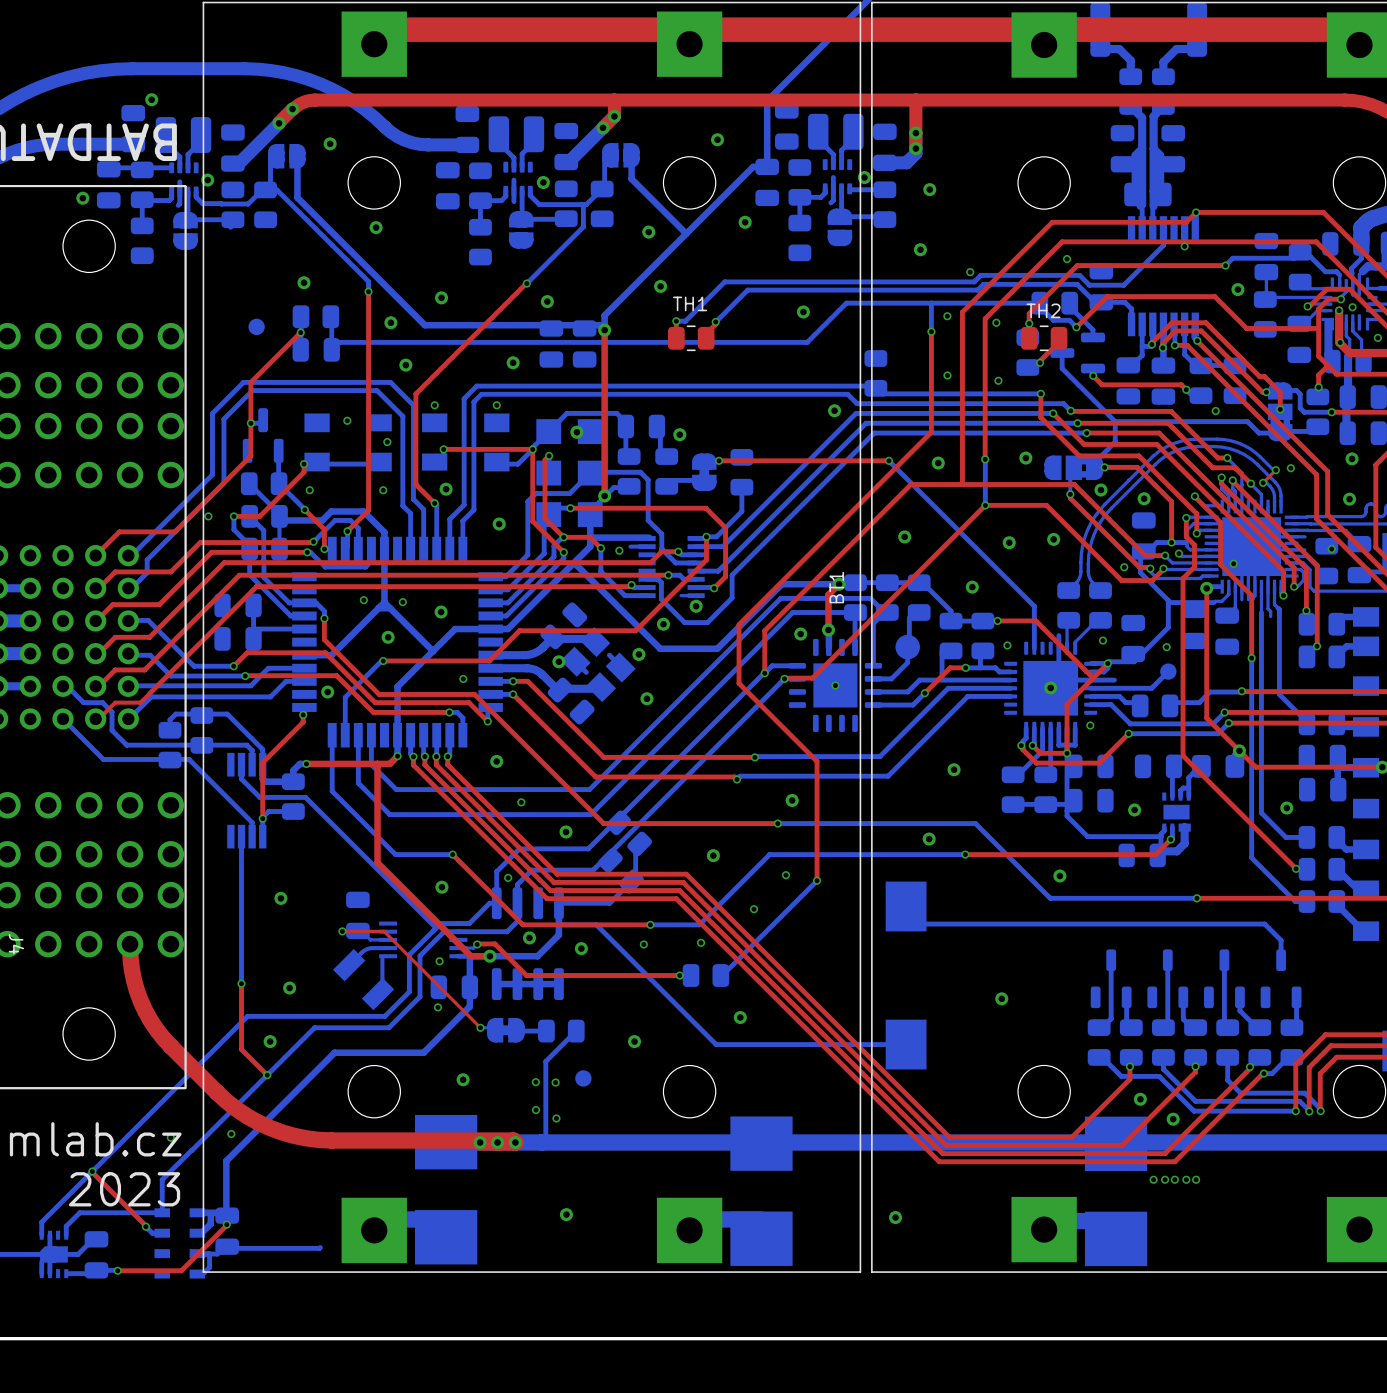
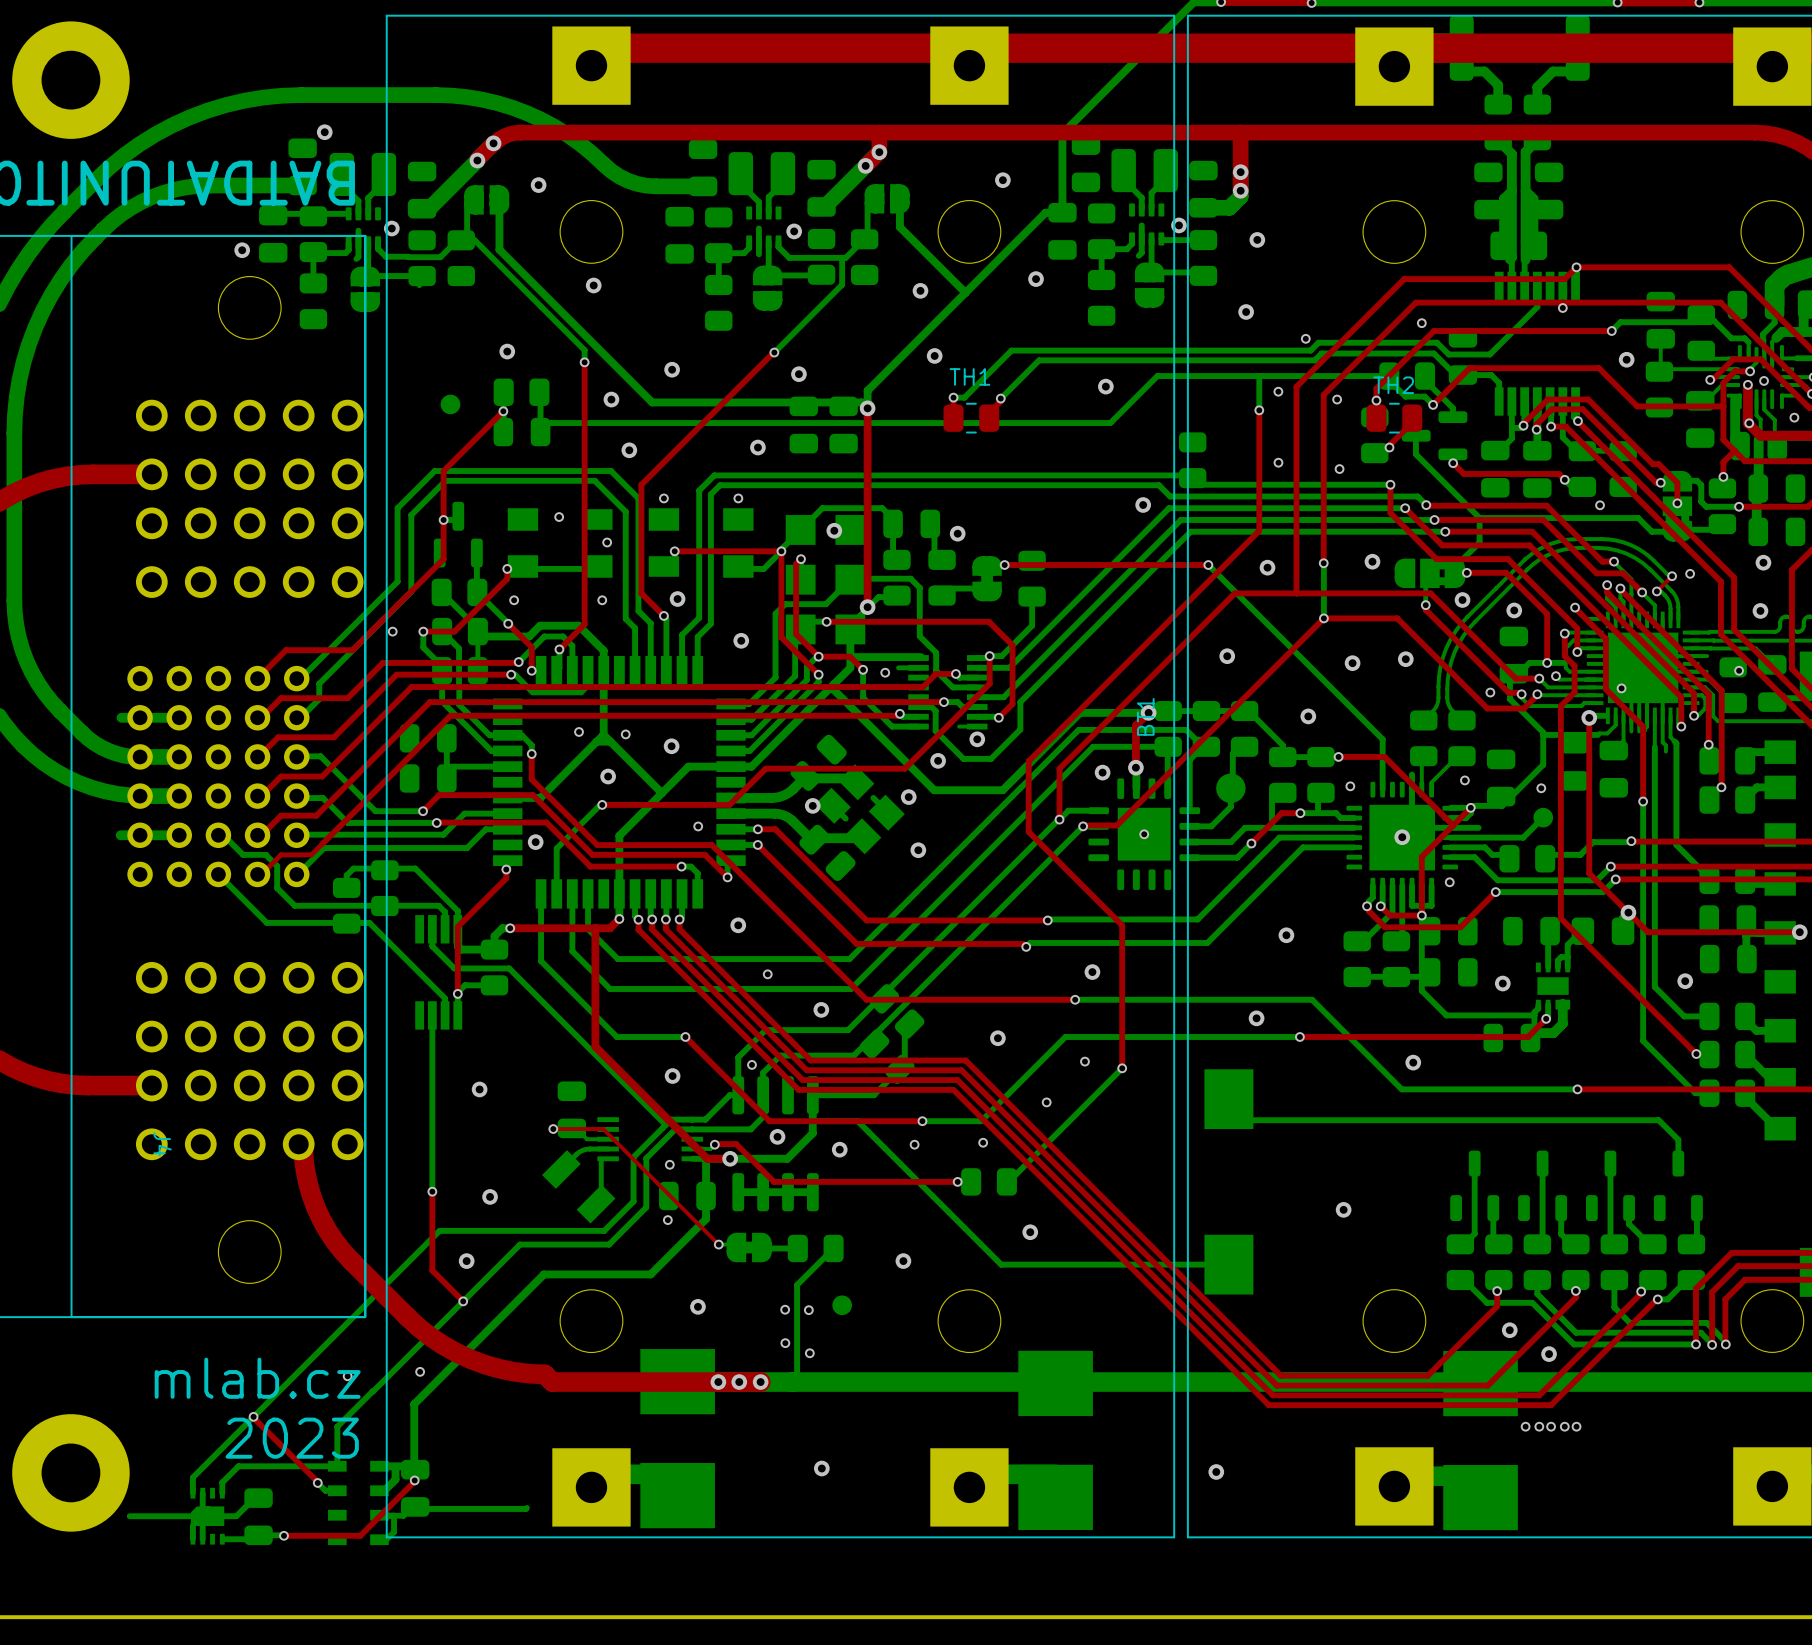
top track: none -> (303, 1143) (305, 1169) (311, 1195) (321, 1219) (335, 1241) (352, 1261) (407, 1316) (443, 1345) (484, 1364) (514, 1371) (544, 1374) (552, 1382) (718, 1382)
top track: (130, 948) (134, 980) (140, 1001) (150, 1020) (163, 1038) (216, 1092) -> none
top track: (216, 1092) (236, 1109) (258, 1122) (281, 1132) (306, 1138) (331, 1140) (513, 1140) (515, 1142) -> none

